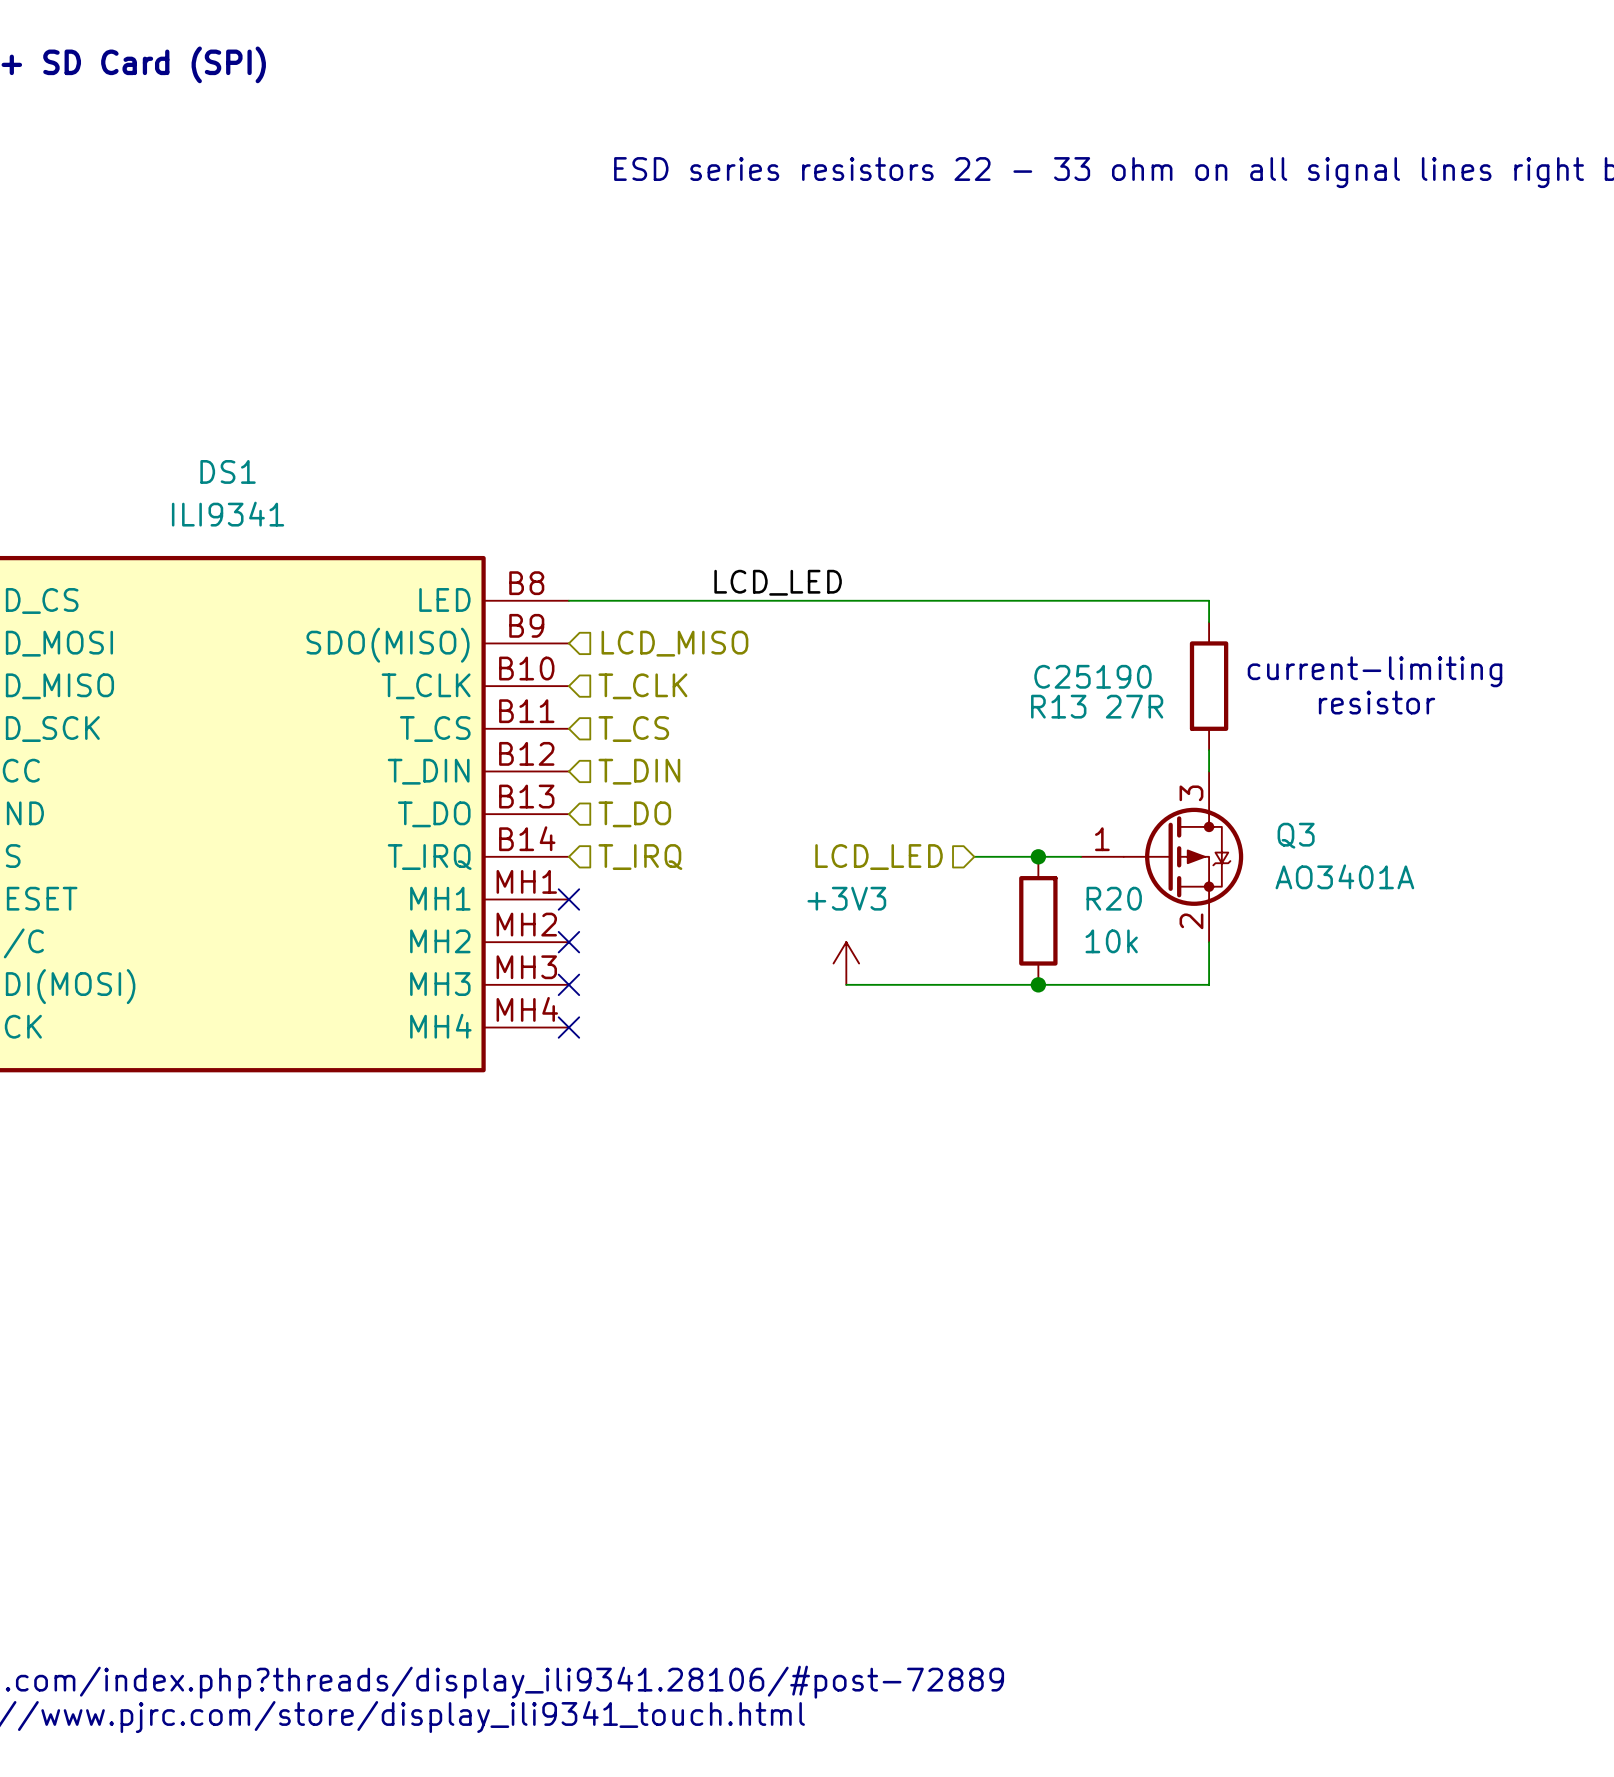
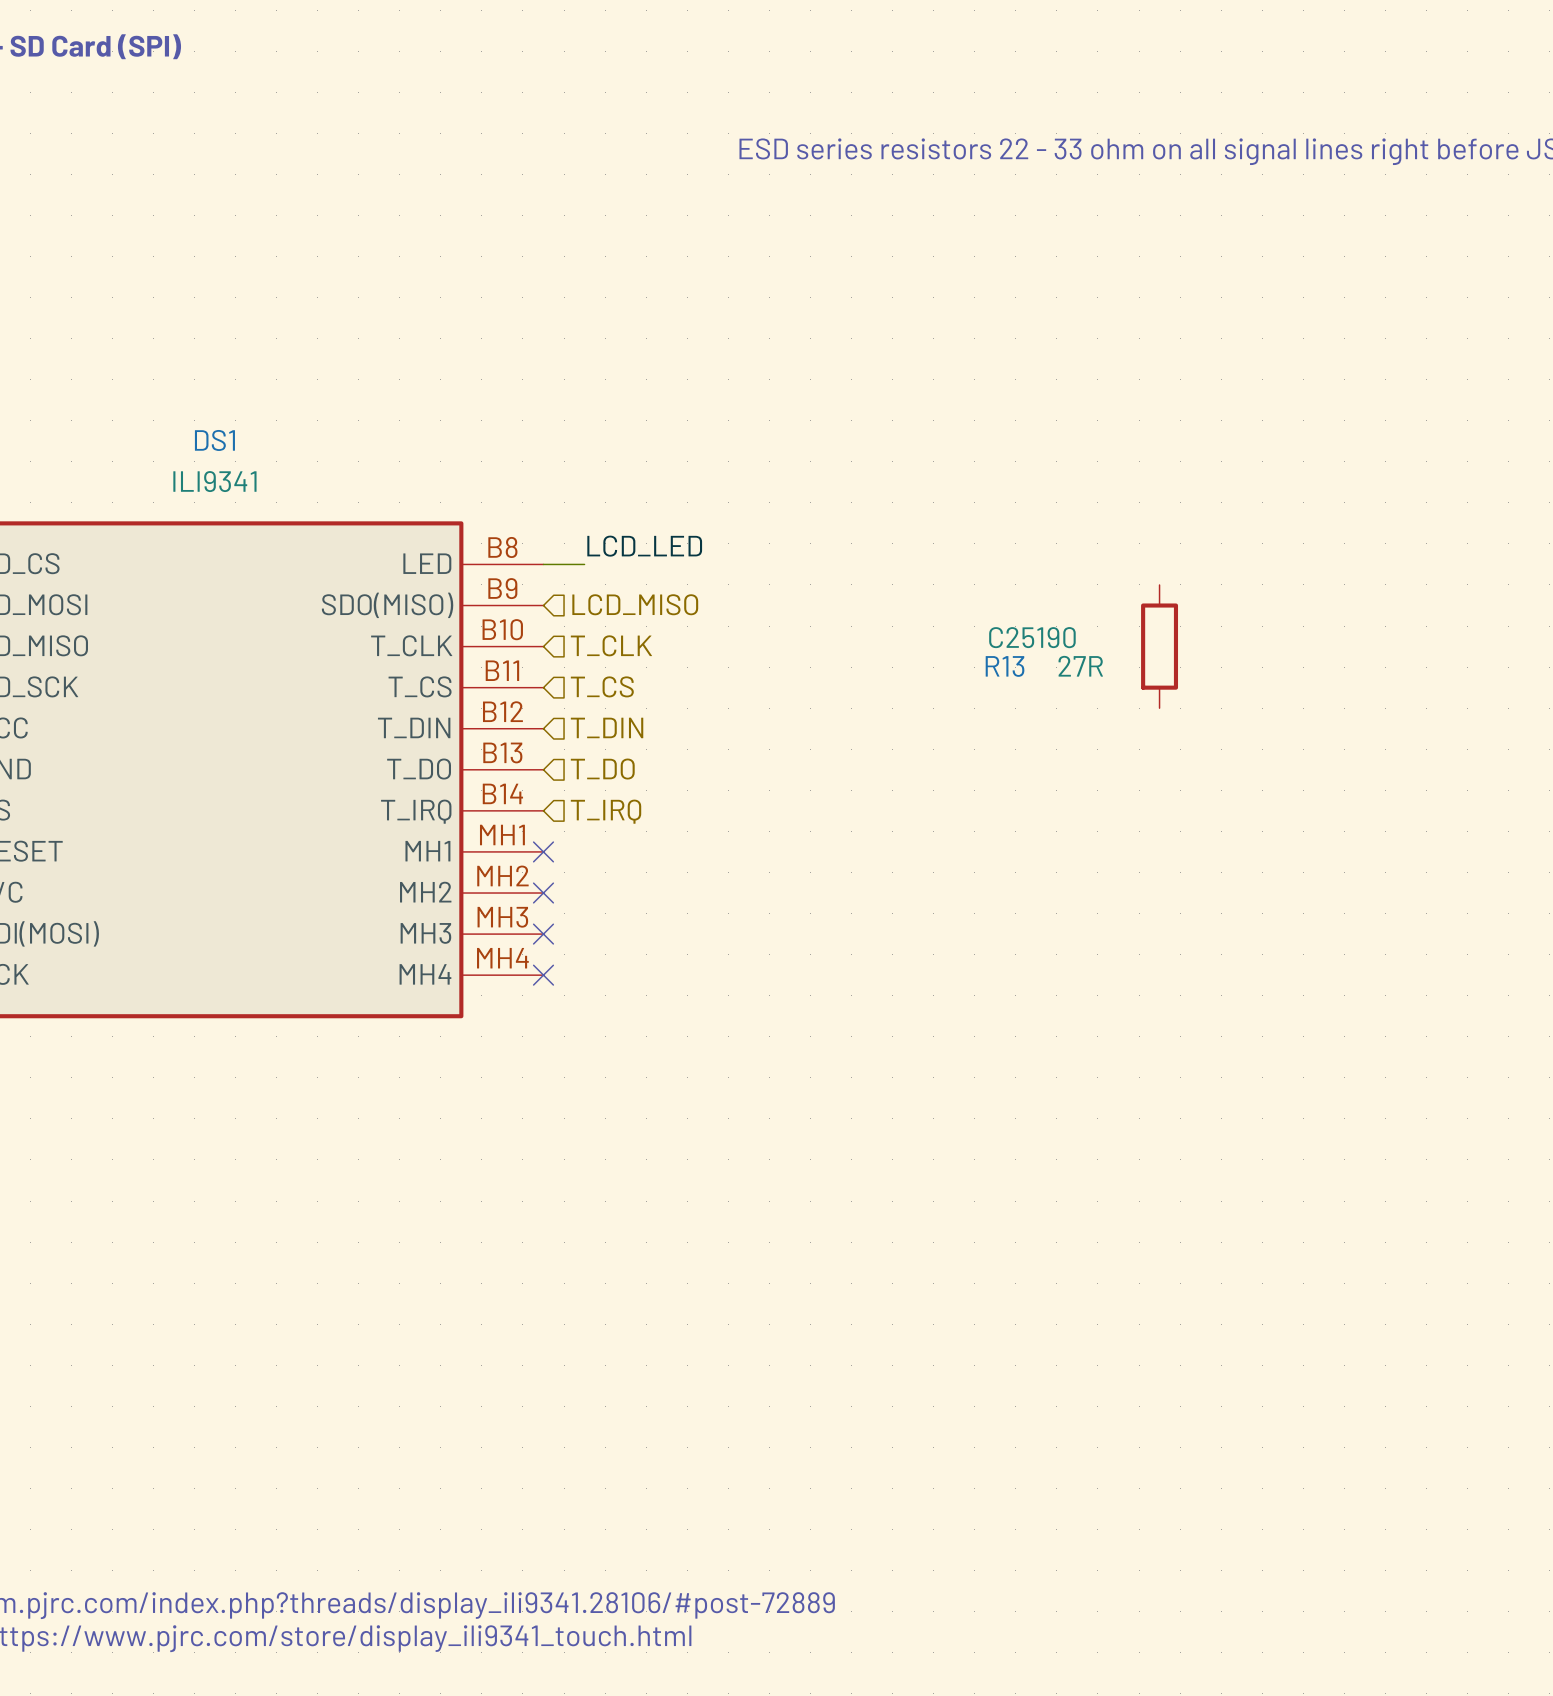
label position: LCD_LED (778, 582) -> LCD_LED (644, 546)
wire: (611, 600) (1209, 600) (1209, 622) -> none
text: current-limiting (1374, 671) -> none
text: resistor (1377, 702) -> none
wire: (1209, 750) (1209, 771) -> none
wire: (974, 856) (1081, 856) -> none
junction: (1038, 856) -> none
Q3: AO3401A (1162, 856) -> none
hierarchical label: LCD_LED (879, 857) -> none
R20: 10k (1038, 920) -> none
wire: (1209, 942) (1209, 984) (846, 984) -> none
power symbol: +3V3 (846, 963) -> none
junction: (1038, 984) -> none

